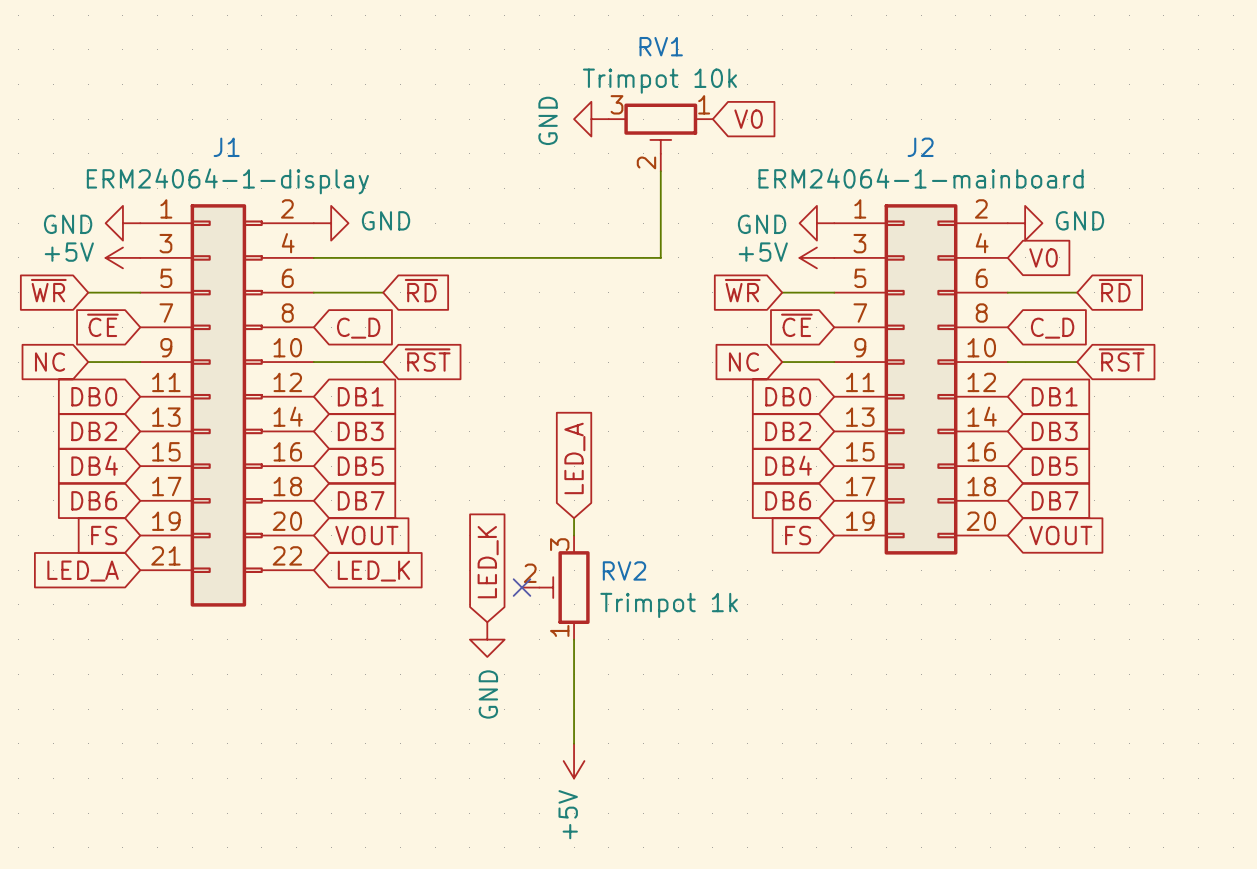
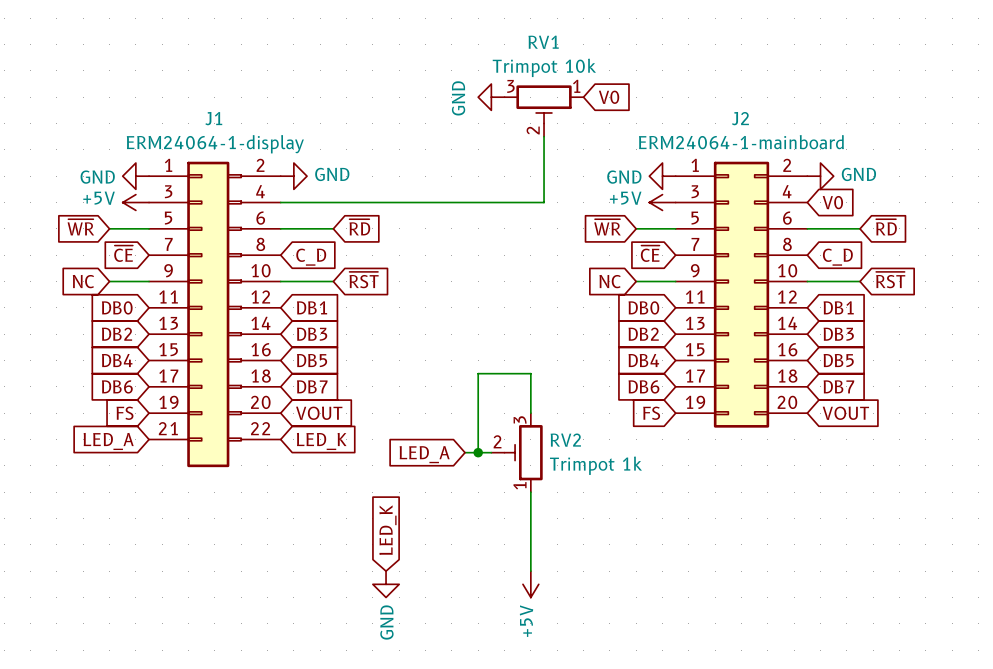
global label rotation: 0° (574, 458) -> 90° counterclockwise (424, 454)
global label position: LED_A (574, 458) -> LED_A (424, 454)
wire: none -> (478, 400) (478, 373) (530, 373) (530, 413)
wire: none -> (478, 413) (478, 452)
global label position: LED_K (488, 562) -> LED_K (388, 530)
no-connect mark: (521, 587) -> none
RV2 position: (555, 587) -> (517, 452)
wire: none -> (465, 452) (491, 452)
junction: none -> (478, 452)
power symbol position: GND (487, 639) -> GND (386, 584)
wire: (574, 639) (574, 743) -> (530, 492) (530, 571)
power symbol position: +5V (574, 761) -> +5V (530, 584)

